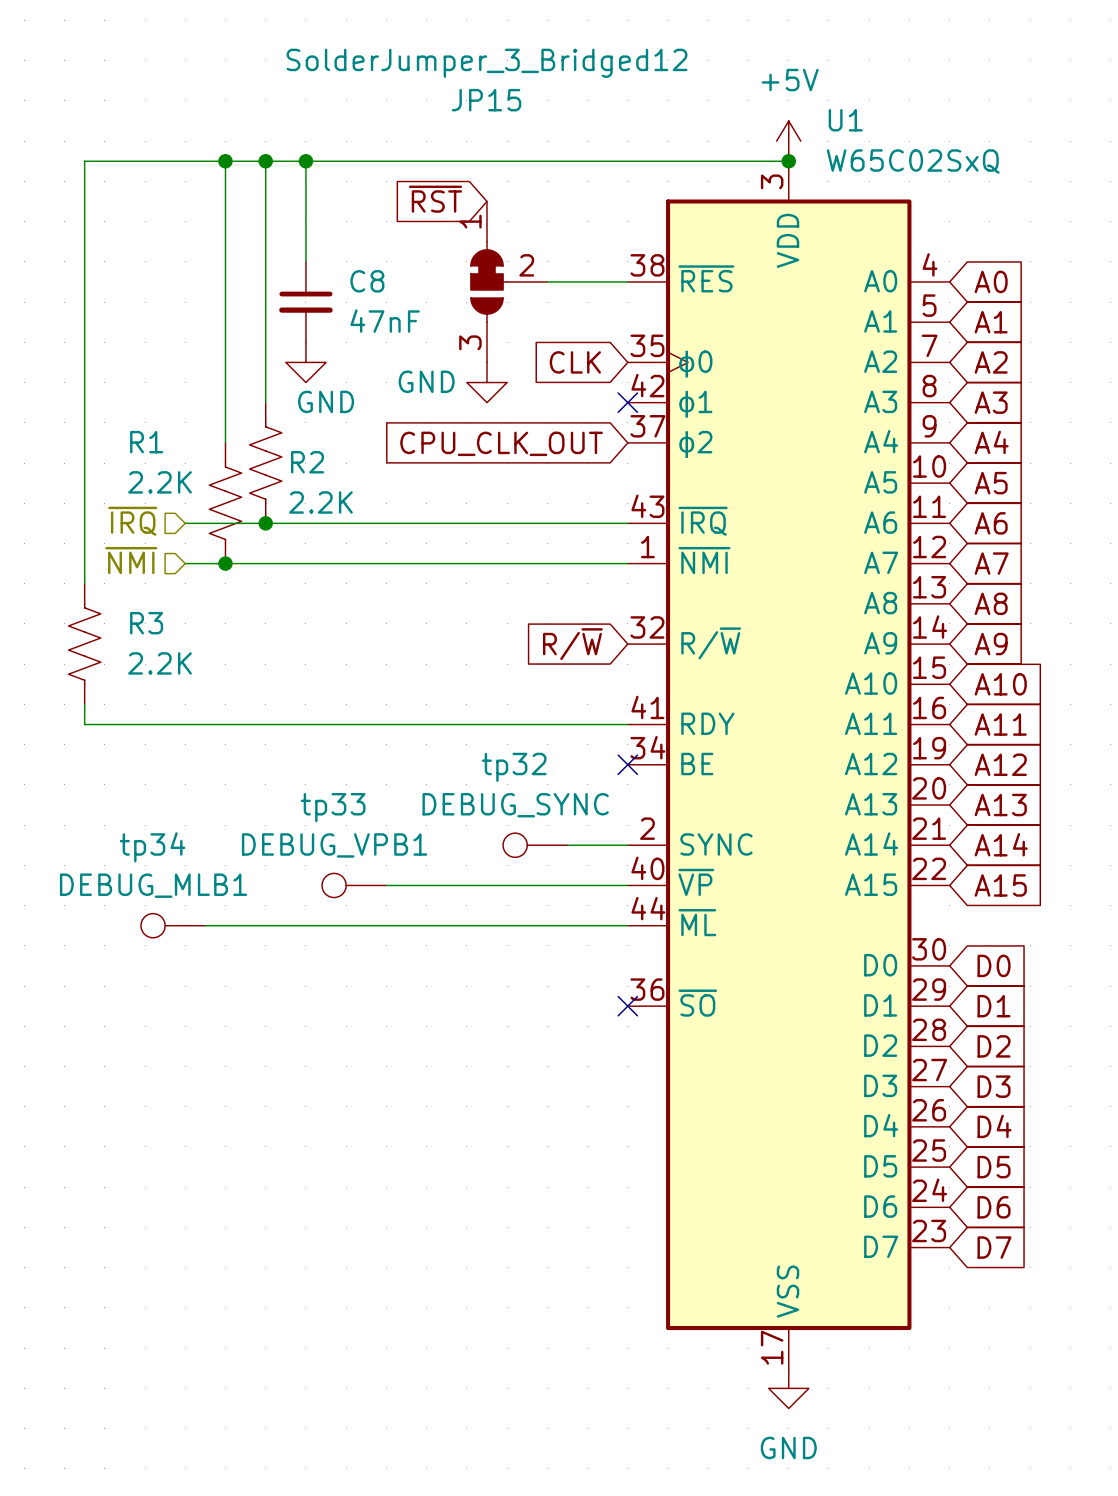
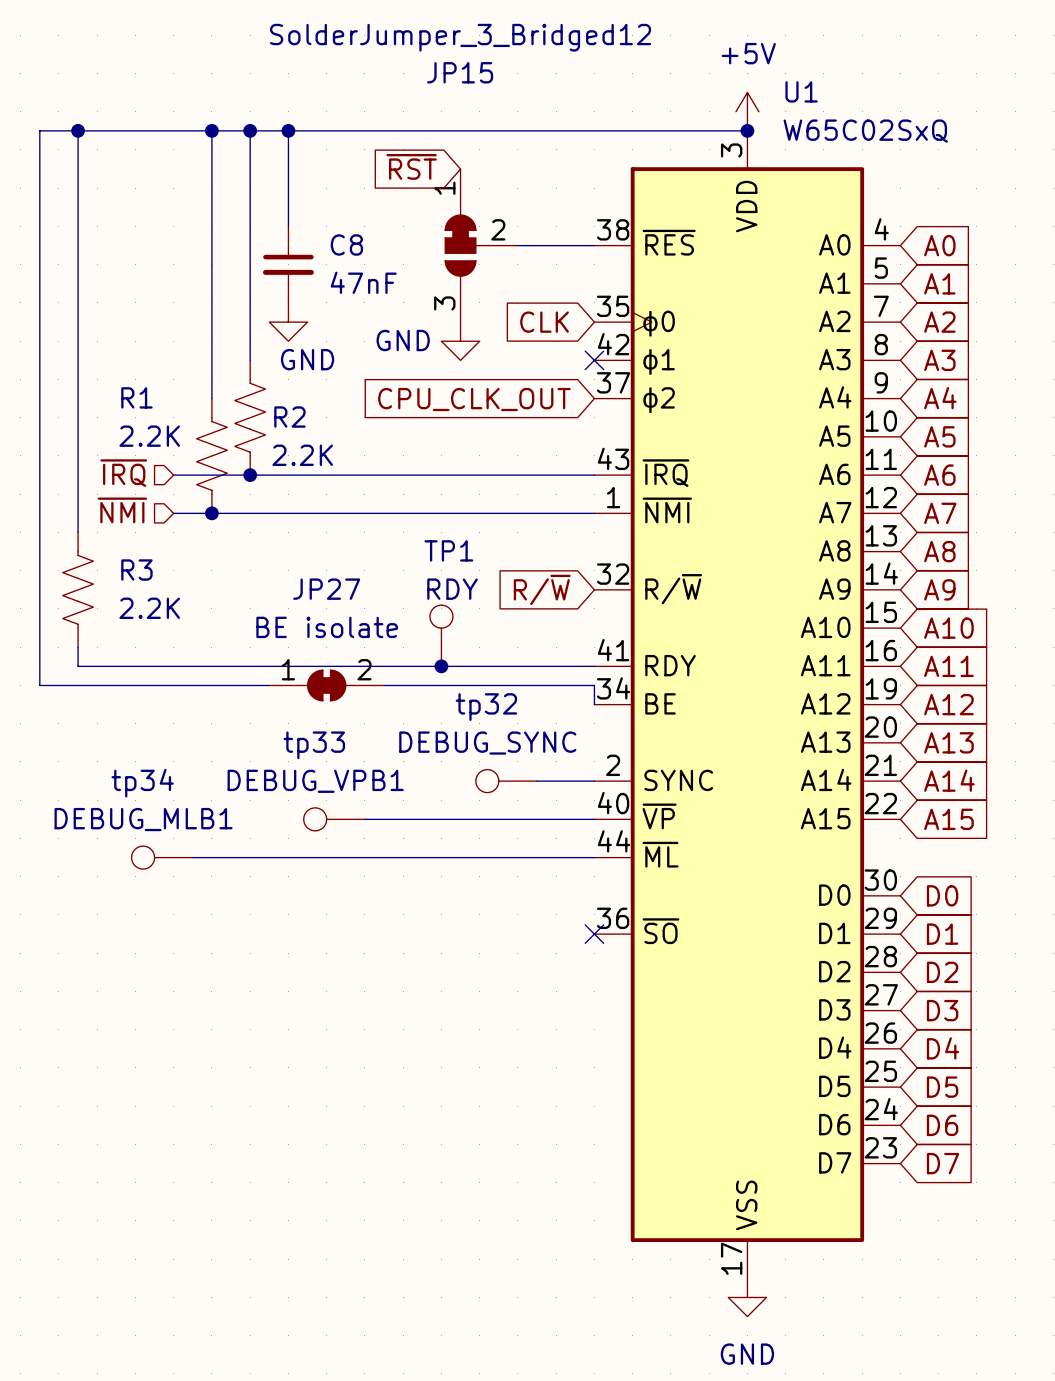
wire: none -> (78, 130) (39, 130) (39, 685) (269, 685)
junction: none -> (78, 130)
TP1: none -> RDY (441, 635)
junction: none -> (441, 666)
JP27: none -> BE isolate (326, 685)
wire: none -> (384, 685) (594, 685) (594, 704)
no-connect mark: (627, 764) -> none

